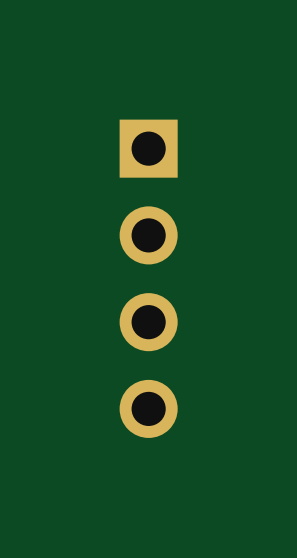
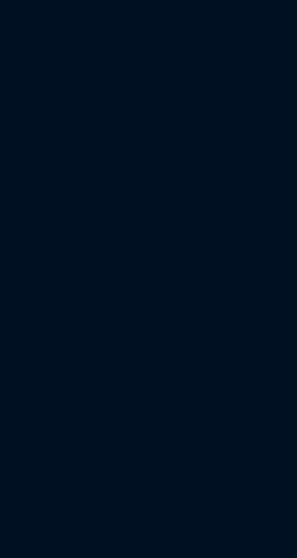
part: (148, 278) -> none

